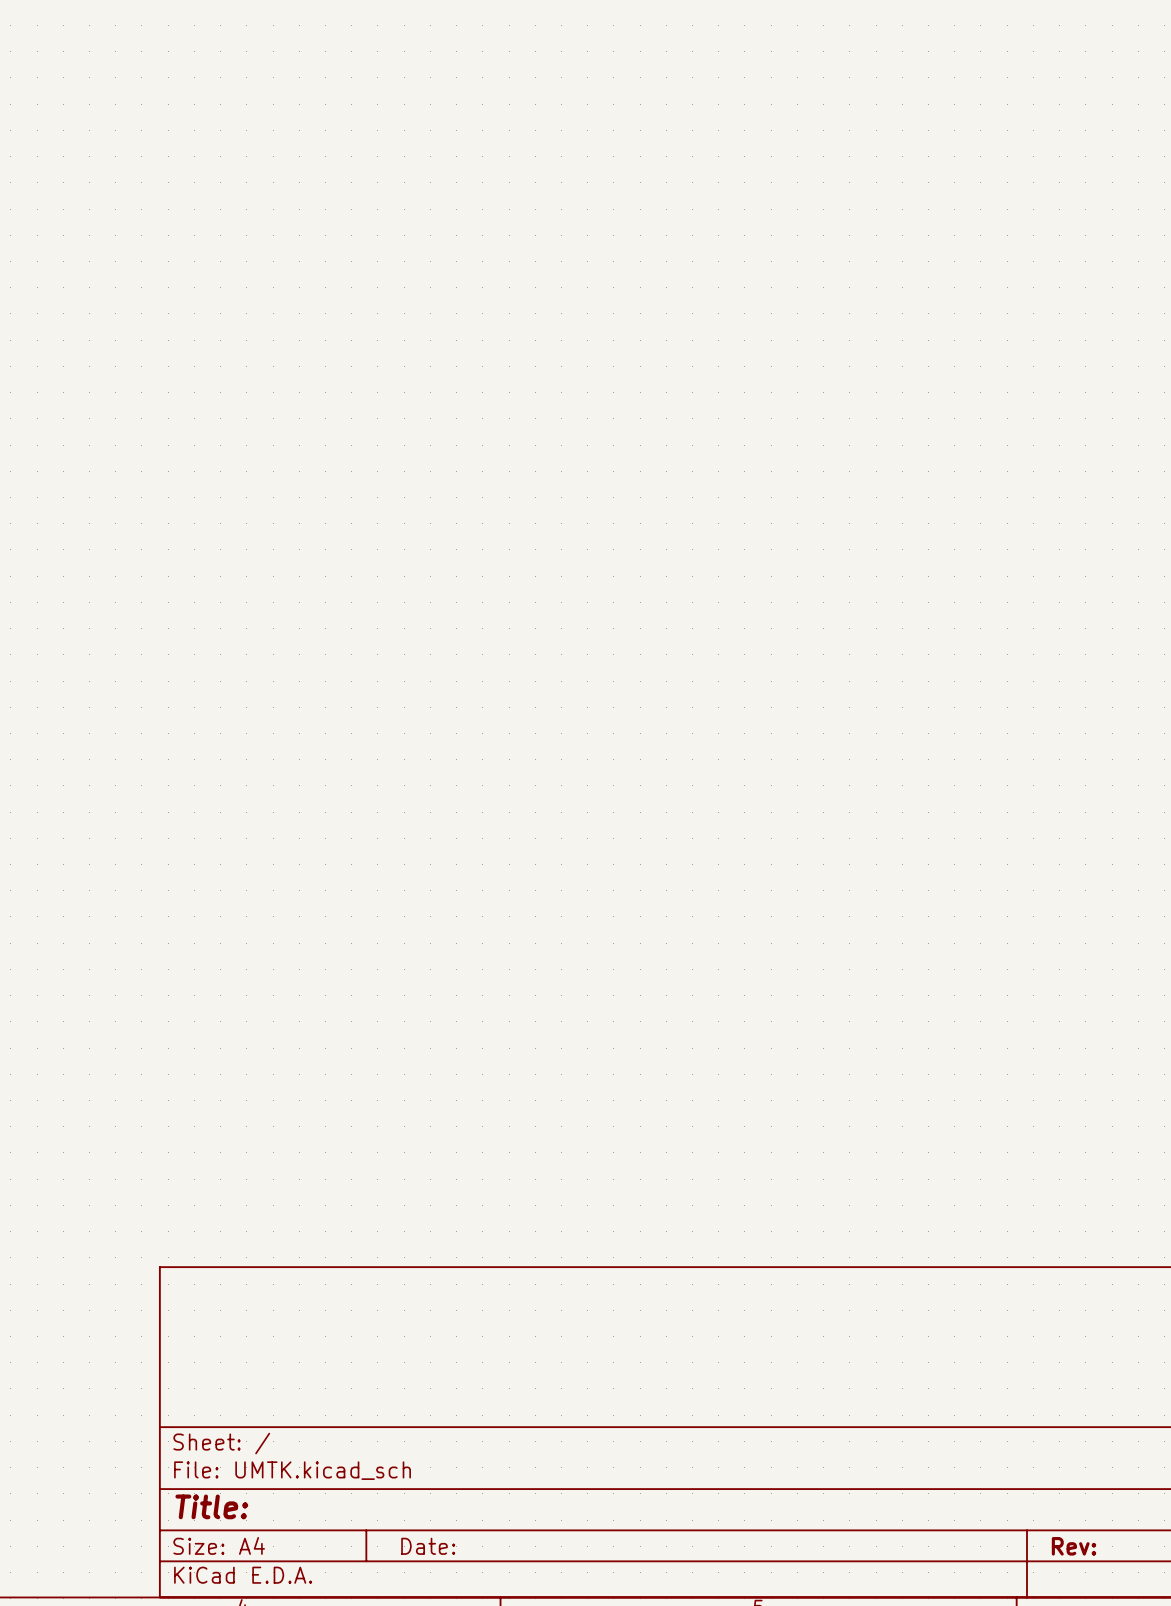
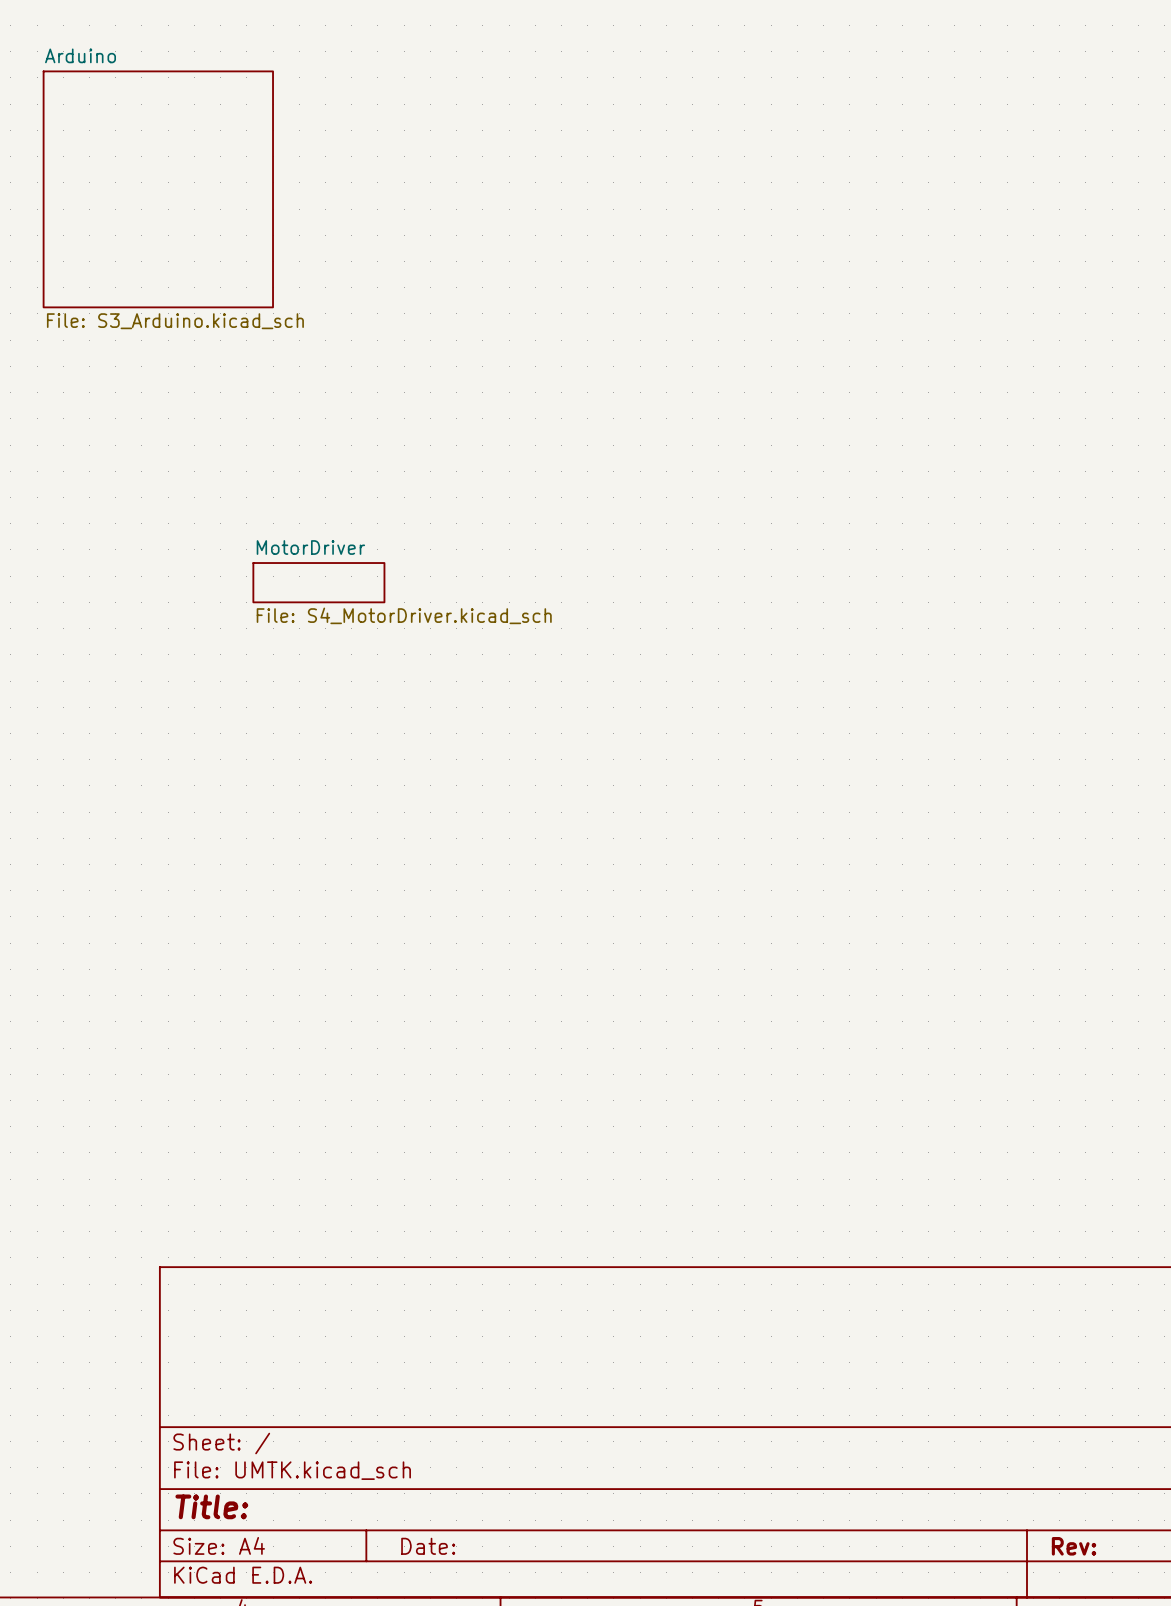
sheet Arduino: none -> File: S3_Arduino.kicad_sch (158, 189)
sheet MotorDriver: none -> File: S4_MotorDriver.kicad_sch (318, 582)

